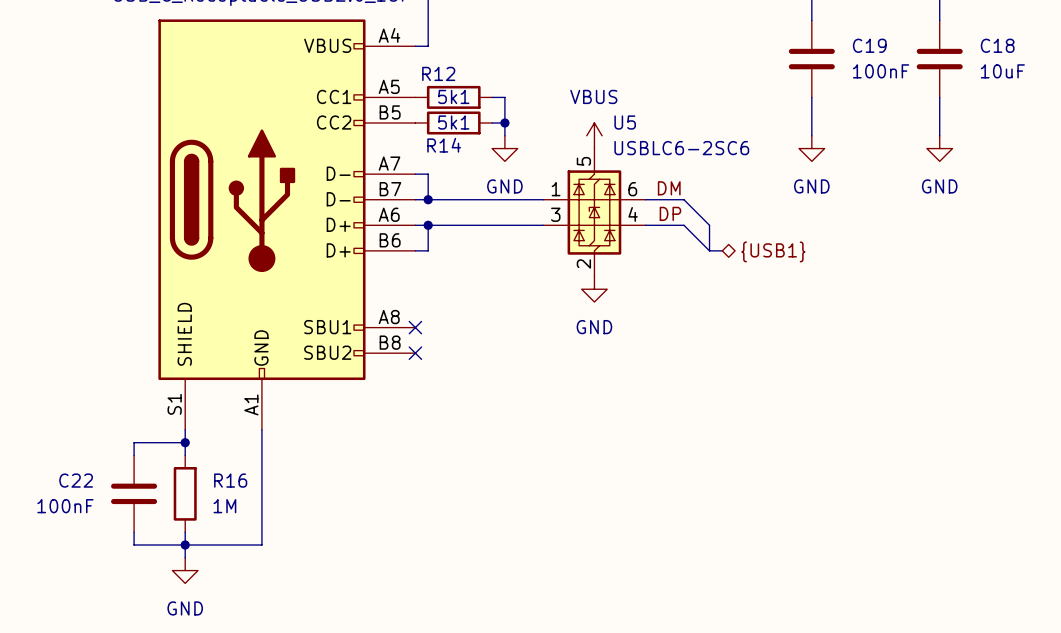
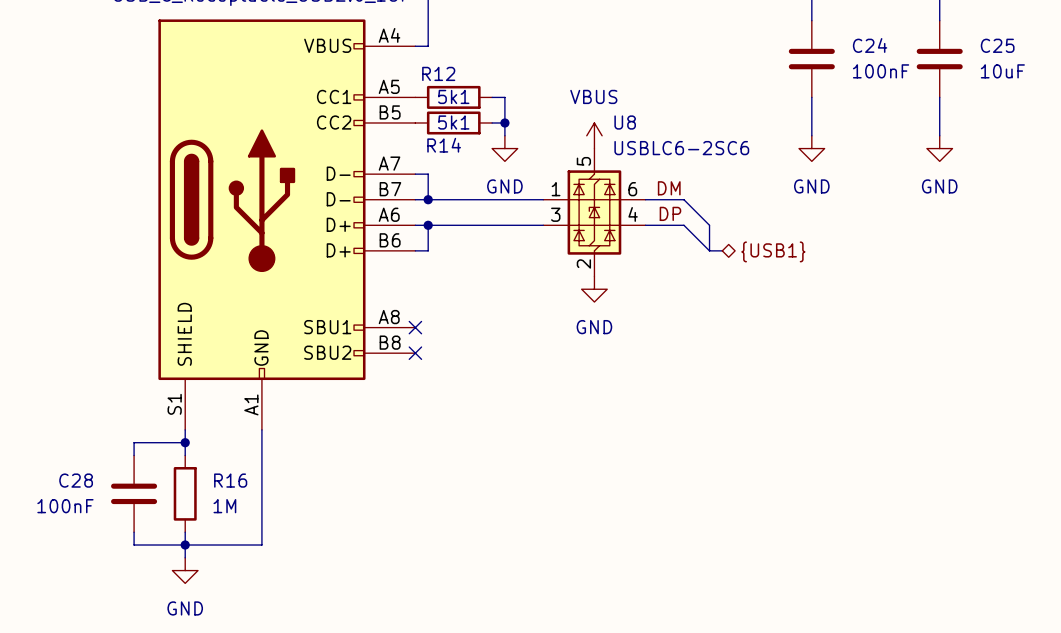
C19 name: C19 (869, 45) -> C24 (870, 45)
C18 name: C18 (997, 45) -> C25 (997, 45)
U5 name: U5 (625, 122) -> U8 (625, 122)
C22 name: C22 (76, 480) -> C28 (76, 480)

